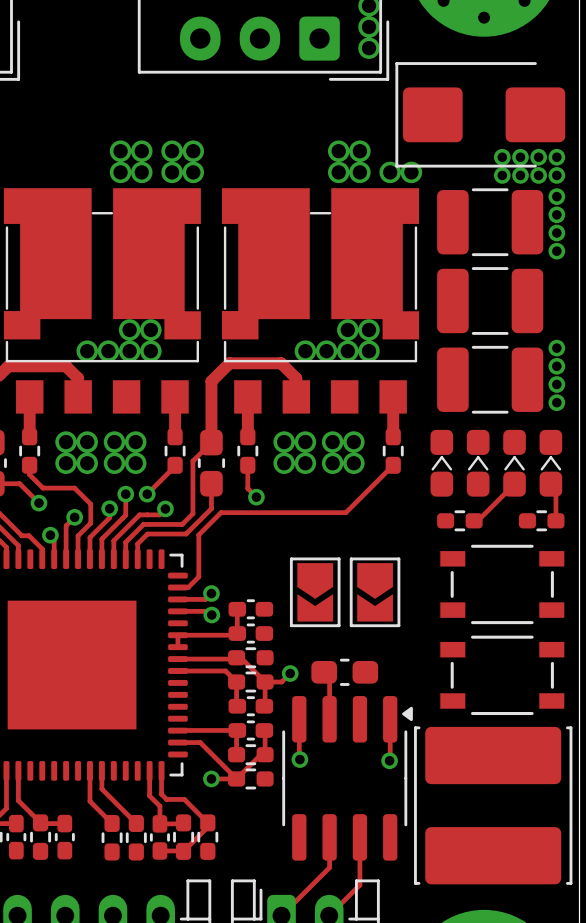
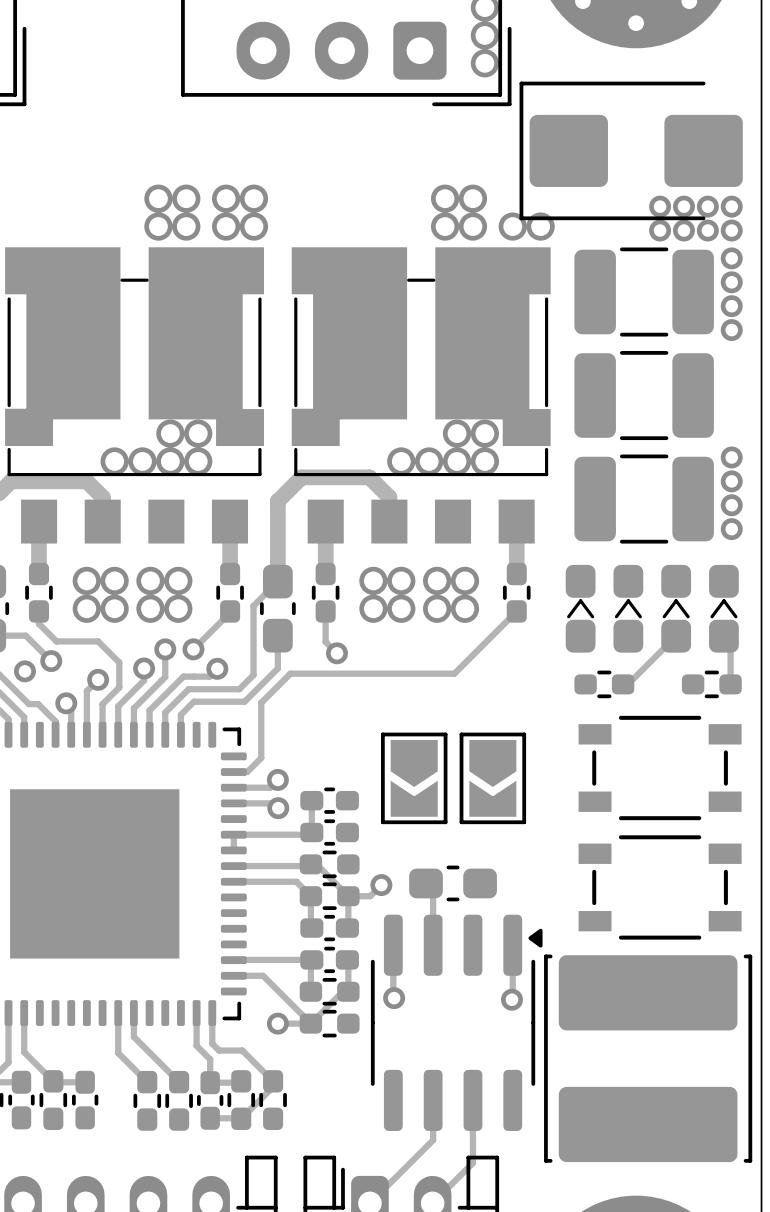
via: none -> (24, 671)

